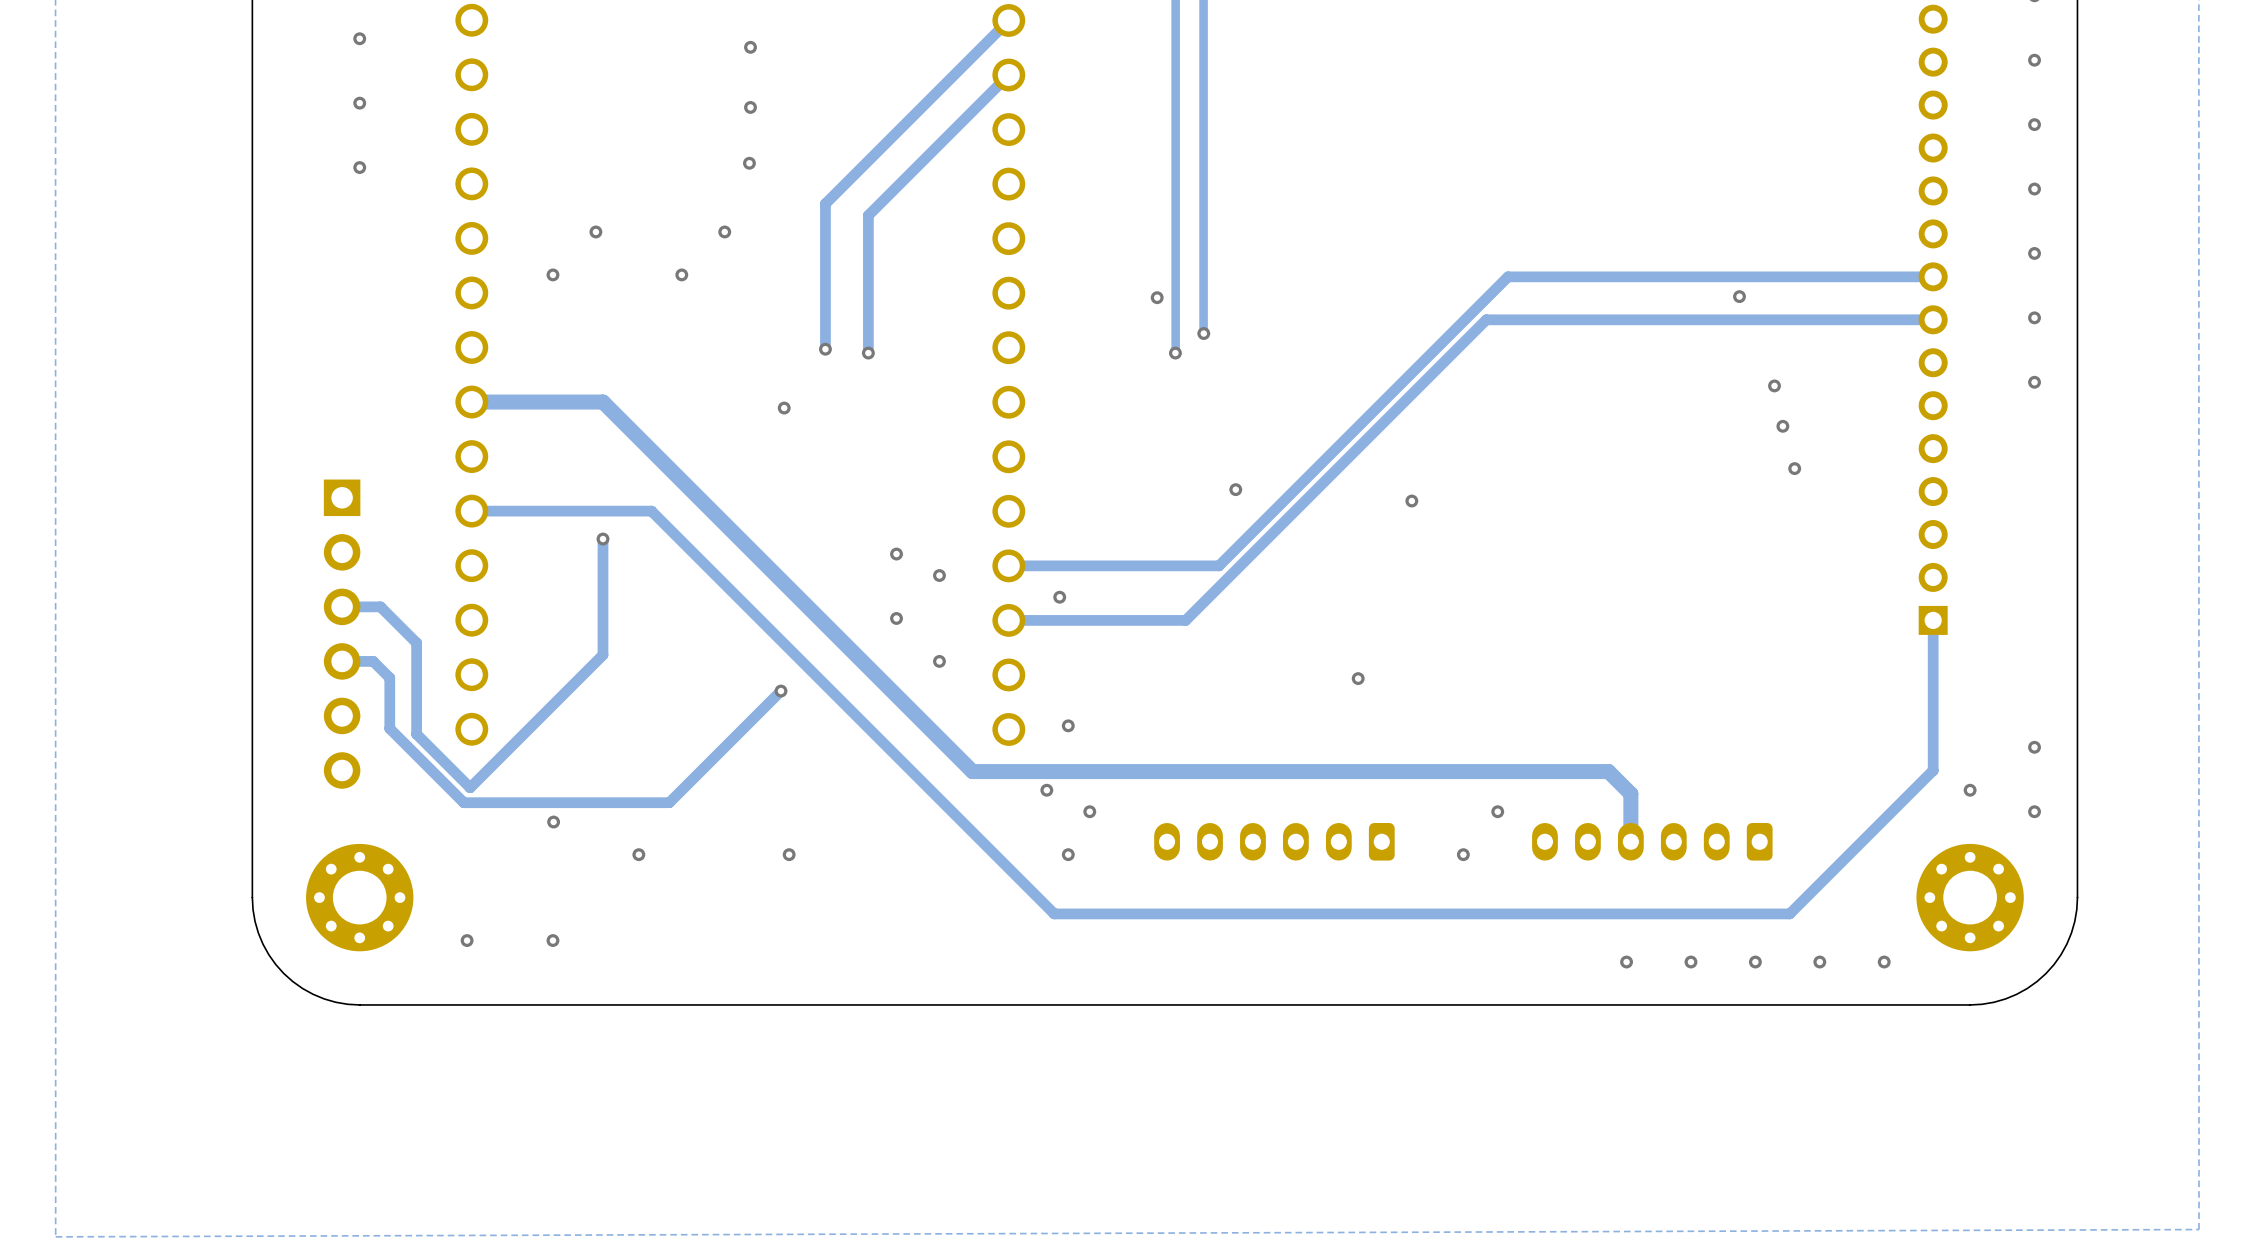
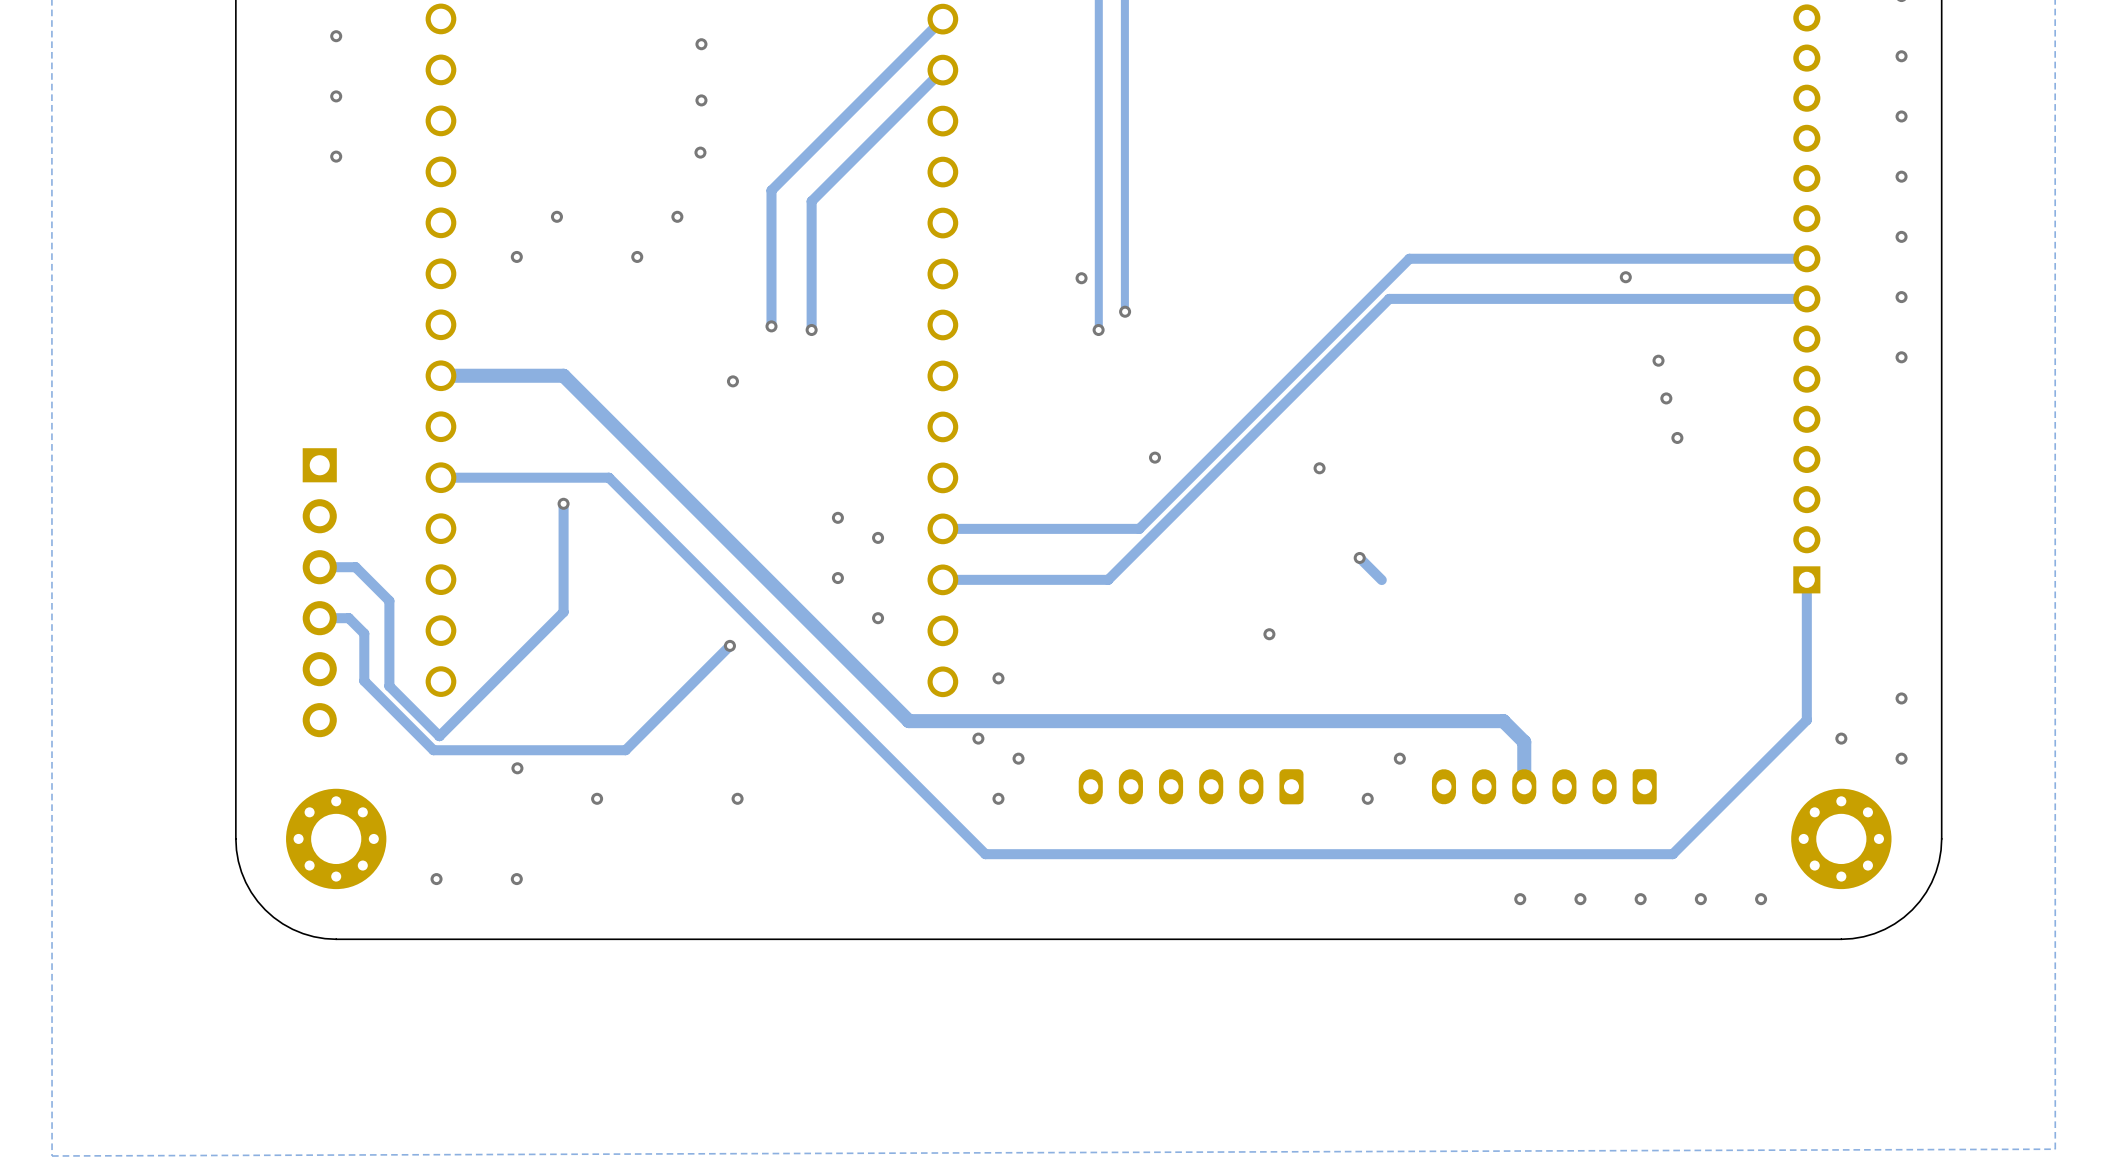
via: (1059, 597) -> none
track: none -> (1359, 557) (1381, 580)
via: none -> (1359, 557)

